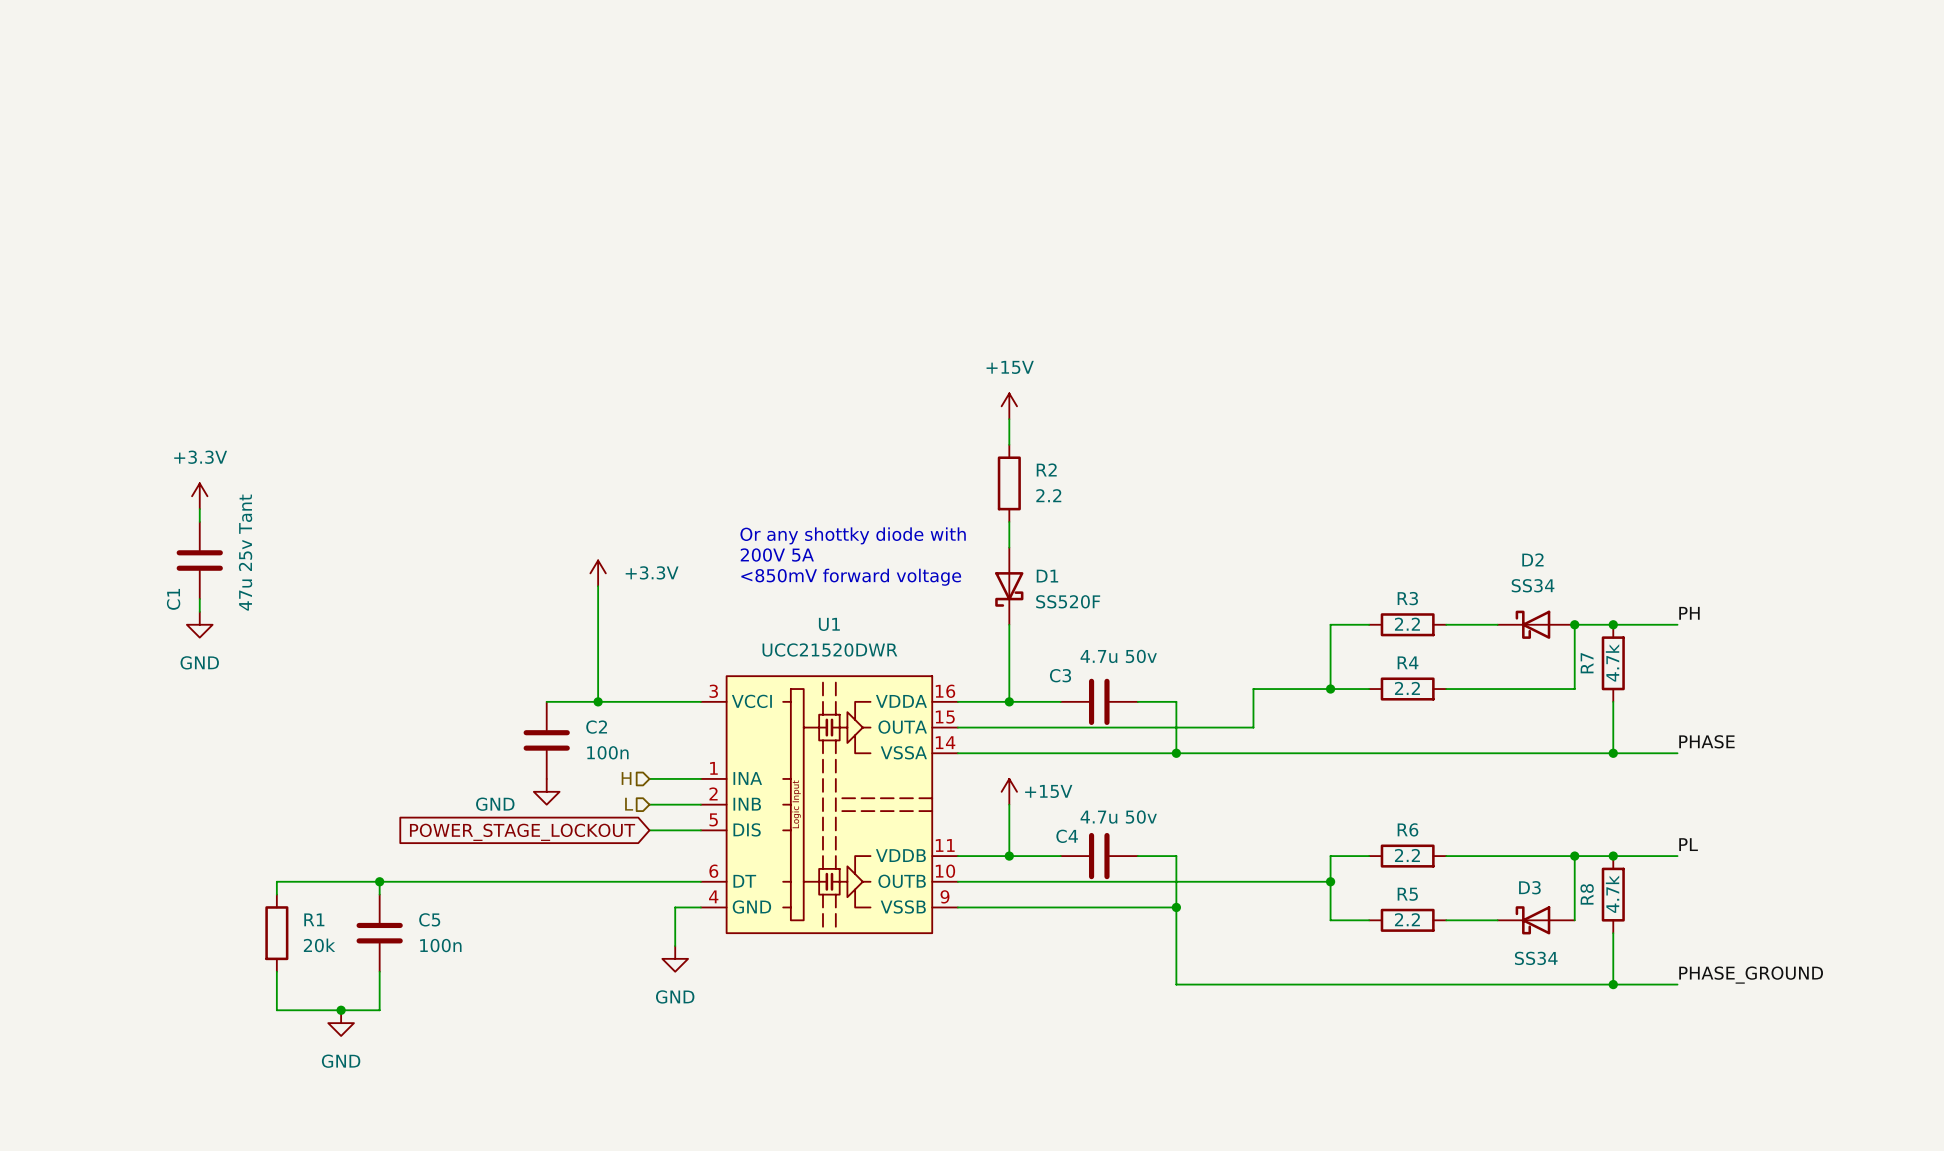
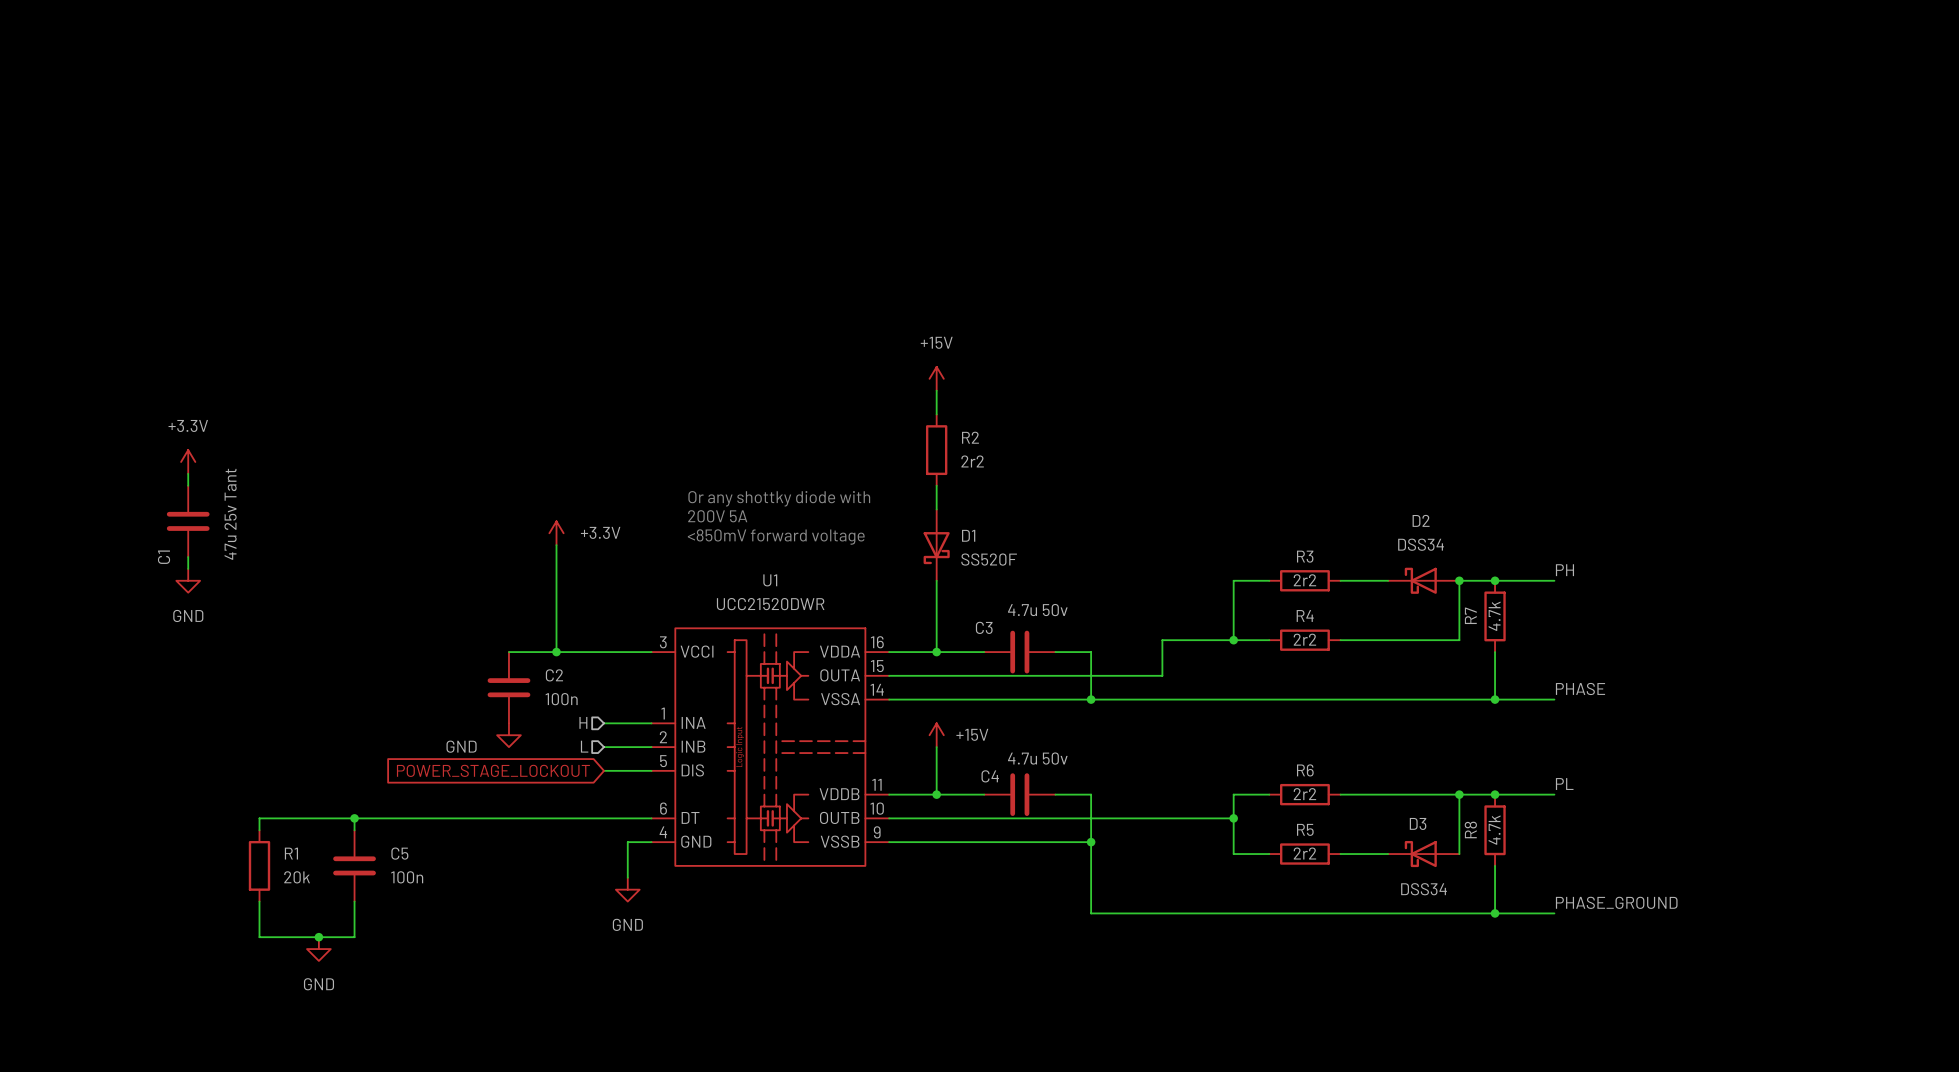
R2 value: 2.2 (1048, 495) -> 2r2 (972, 461)
D2 value: SS34 (1533, 585) -> DSS34 (1421, 544)
R3 value: 2.2 (1407, 624) -> 2r2 (1304, 580)
R4 value: 2.2 (1407, 688) -> 2r2 (1304, 639)
R6 value: 2.2 (1407, 855) -> 2r2 (1304, 794)
R5 value: 2.2 (1407, 919) -> 2r2 (1304, 853)
D3 value: SS34 (1536, 958) -> DSS34 (1424, 889)

